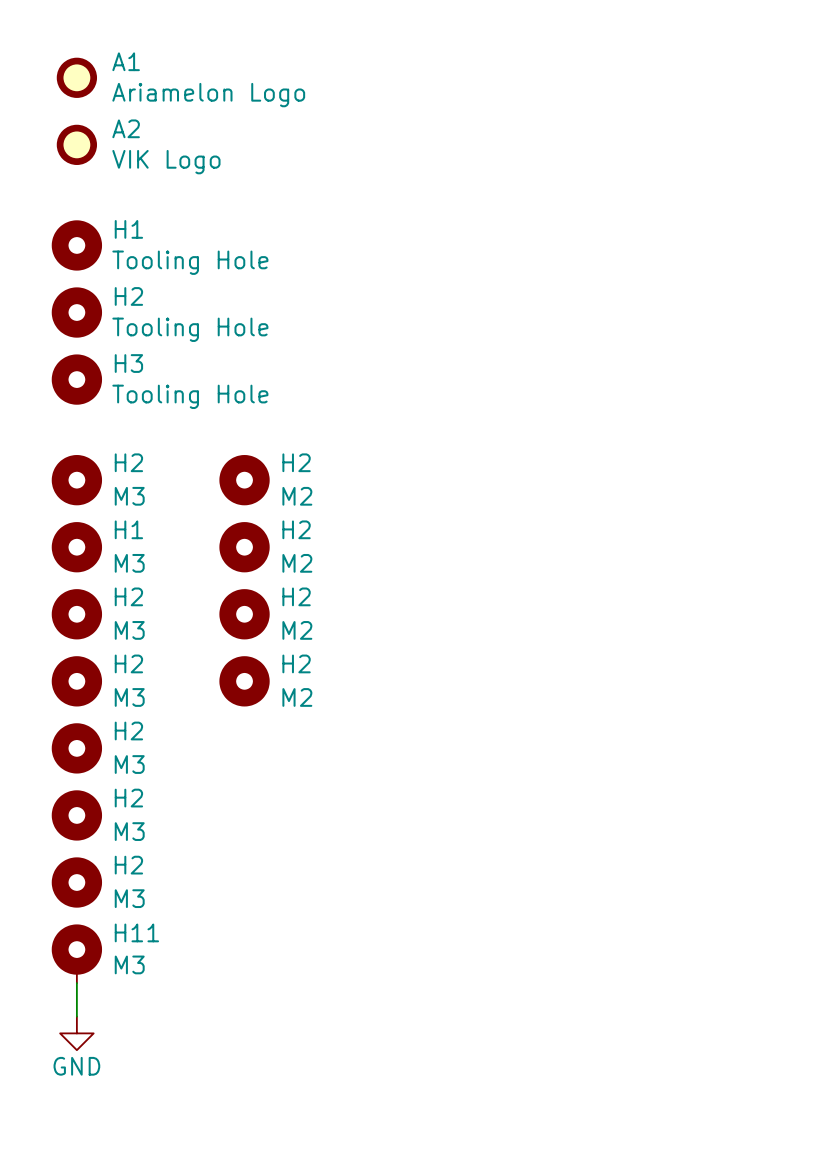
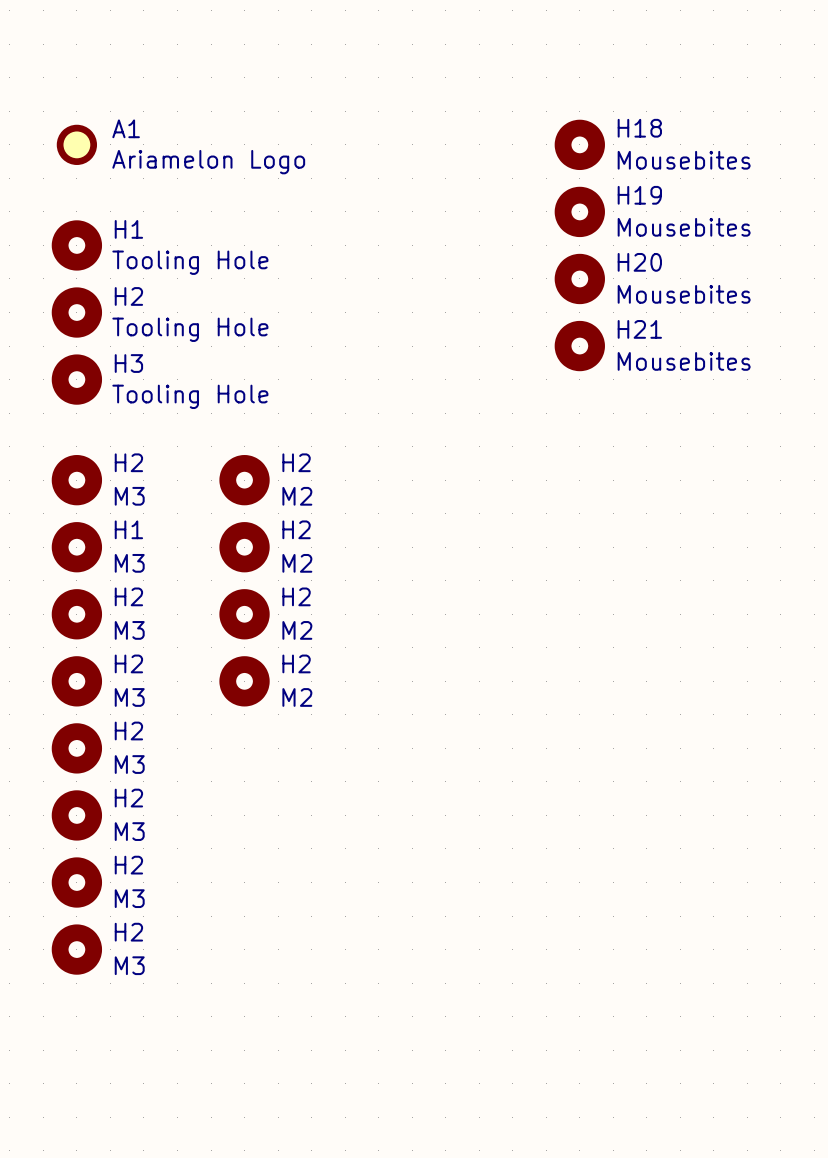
A1: Ariamelon Logo (76, 77) -> none
A2 name: A2 (126, 128) -> A1 (126, 128)
H18: none -> Mousebites (579, 144)
A2 value: VIK Logo (166, 162) -> Ariamelon Logo (208, 162)
H19: none -> Mousebites (579, 211)
H20: none -> Mousebites (579, 278)
H21: none -> Mousebites (579, 346)
H2: none -> M3 (76, 949)
H11: M3 (76, 953) -> none
wire: (76, 983) (76, 1016) -> none
power symbol: GND (76, 1033) -> none

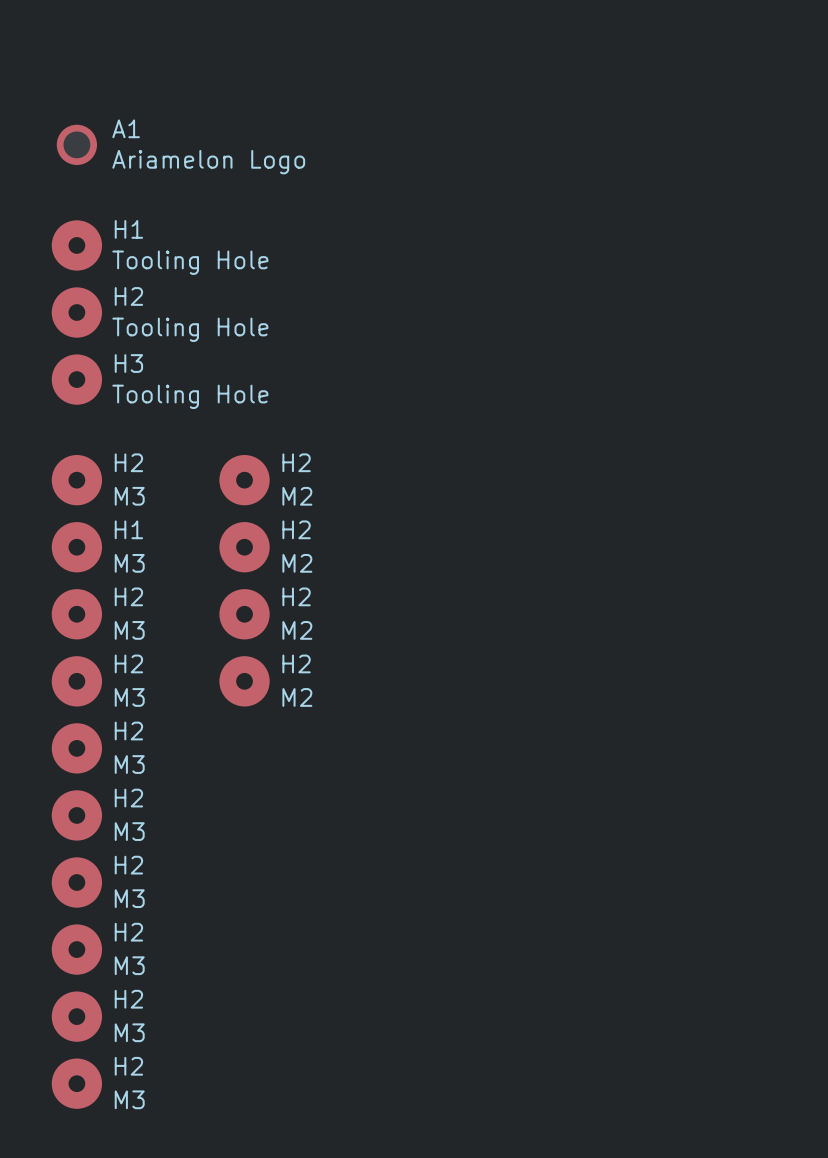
H18: Mousebites (579, 144) -> none
H19: Mousebites (579, 211) -> none
H20: Mousebites (579, 278) -> none
H21: Mousebites (579, 346) -> none
H2: none -> M3 (76, 1016)
H2: none -> M3 (76, 1083)

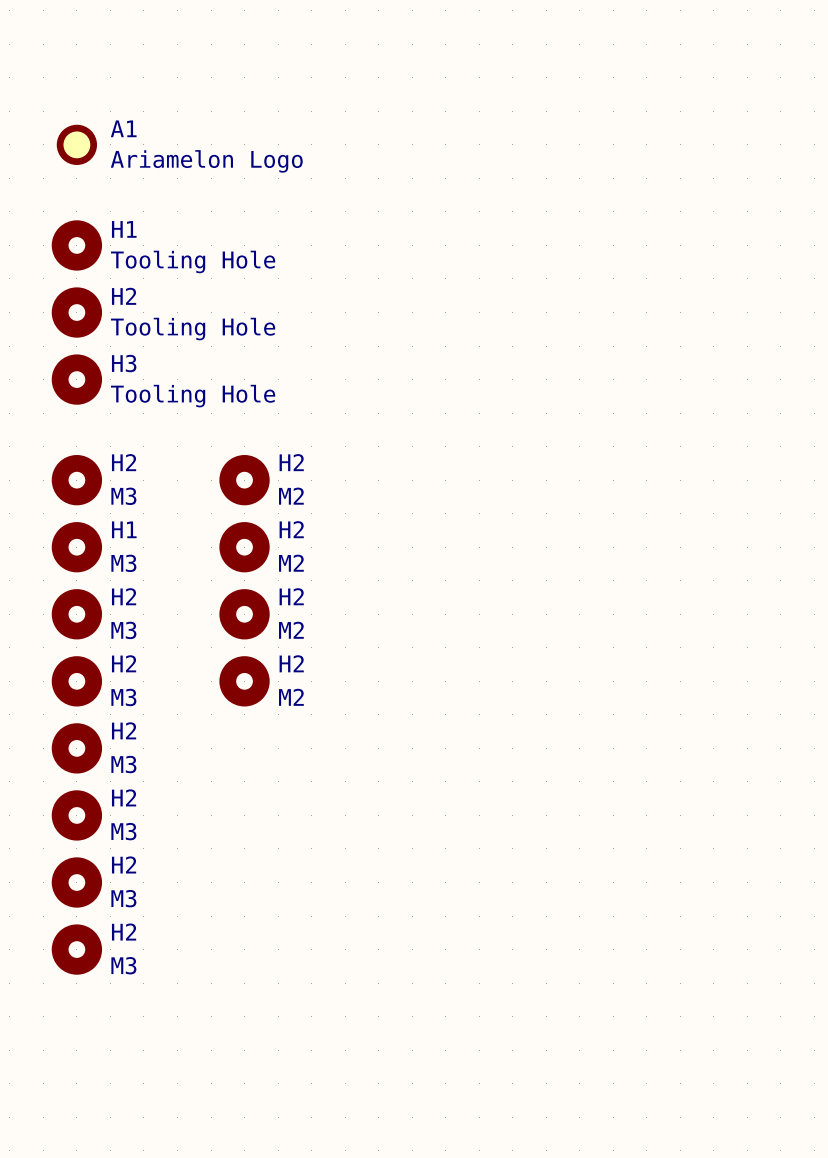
H2: M3 (76, 1016) -> none
H2: M3 (76, 1083) -> none

